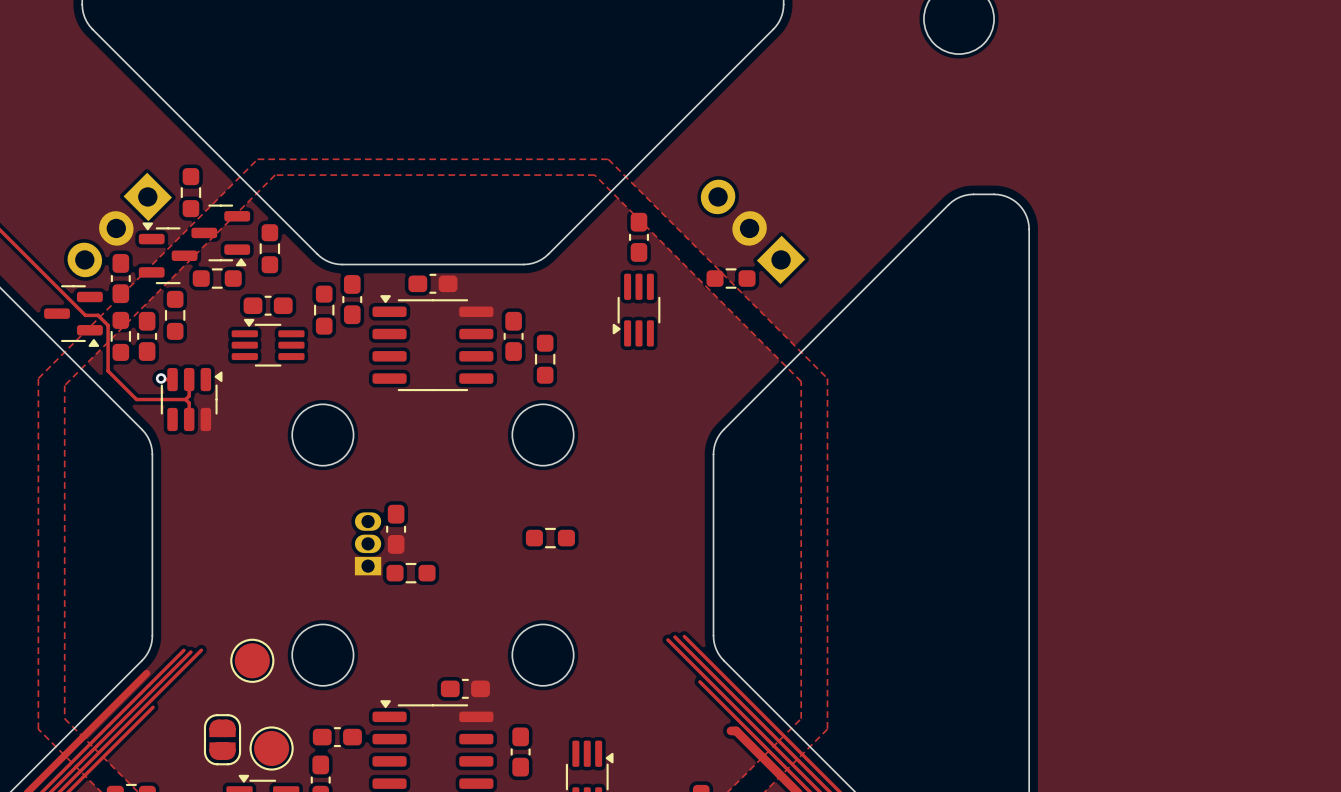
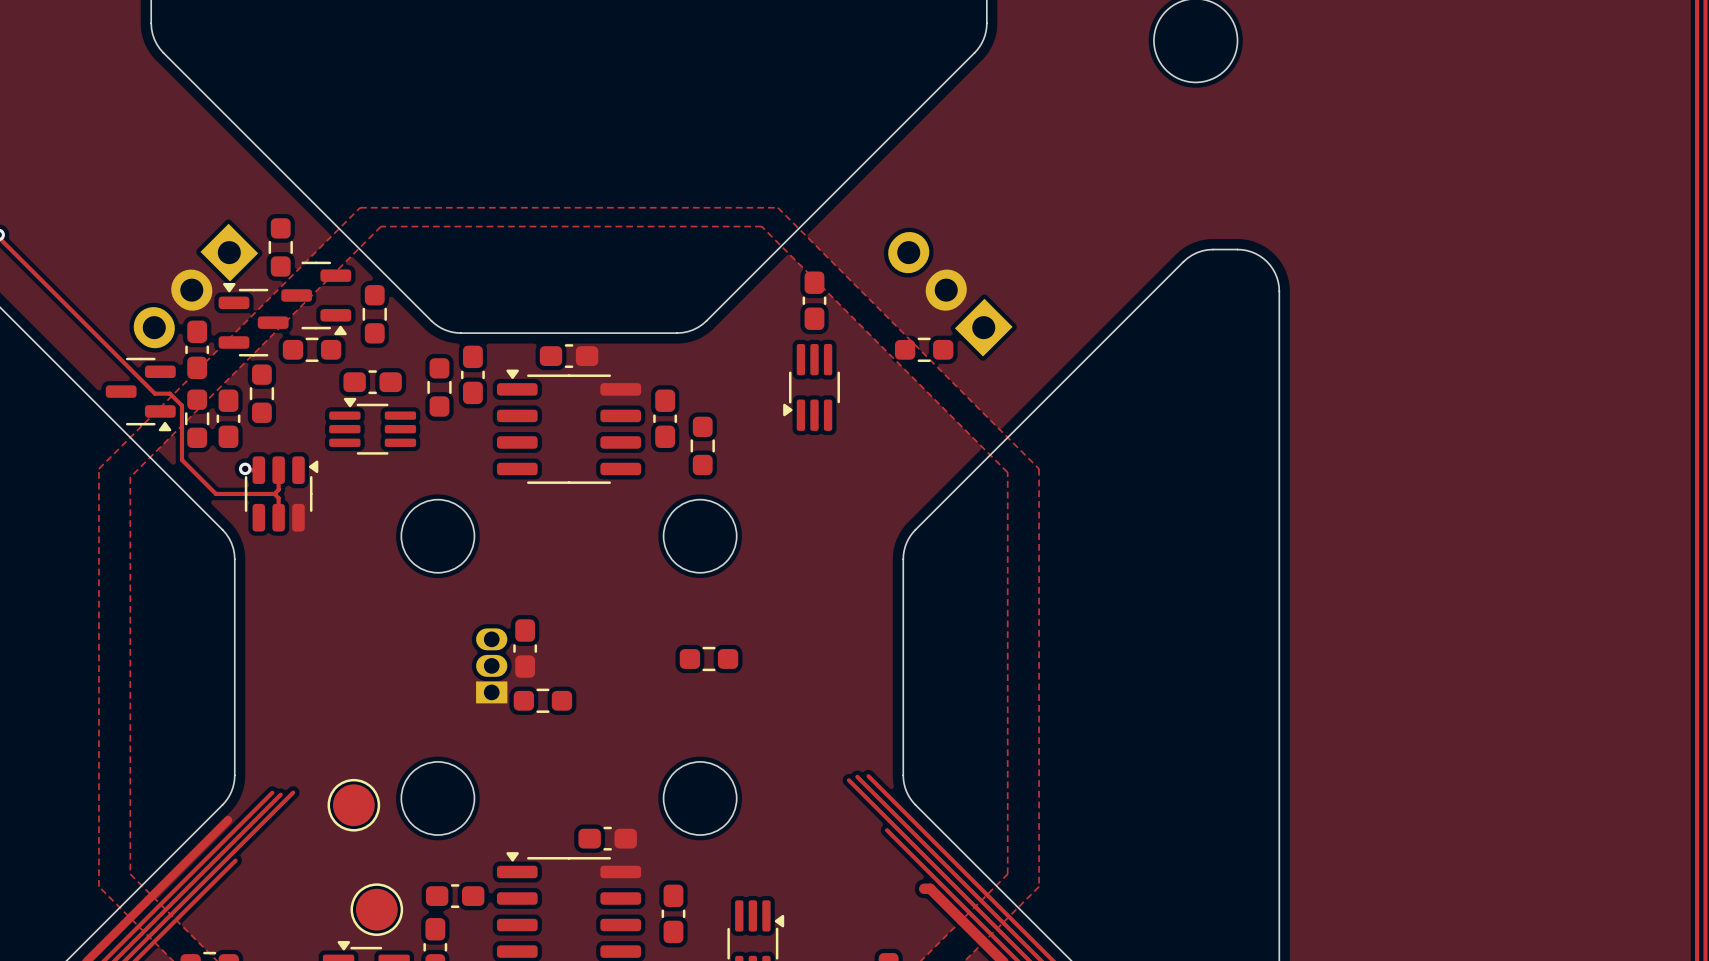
part: (222, 739) -> none

